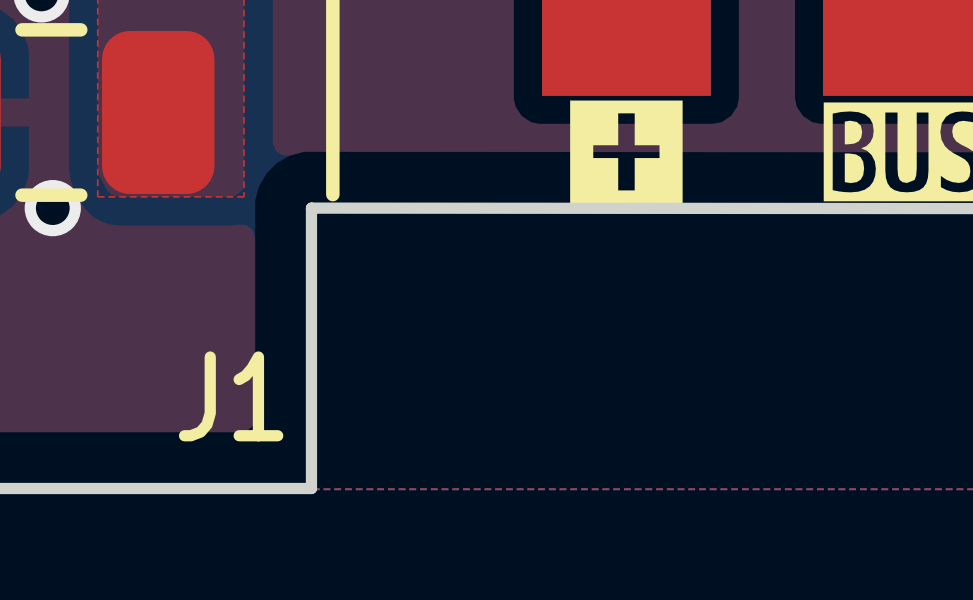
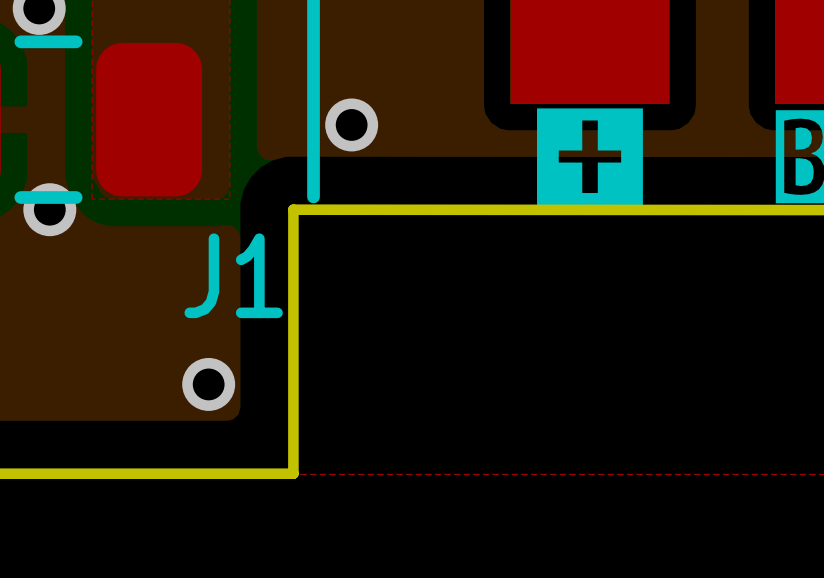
via: none -> (351, 124)
via: none -> (208, 384)
J1 name position: J1 (231, 396) -> J1 (233, 275)

